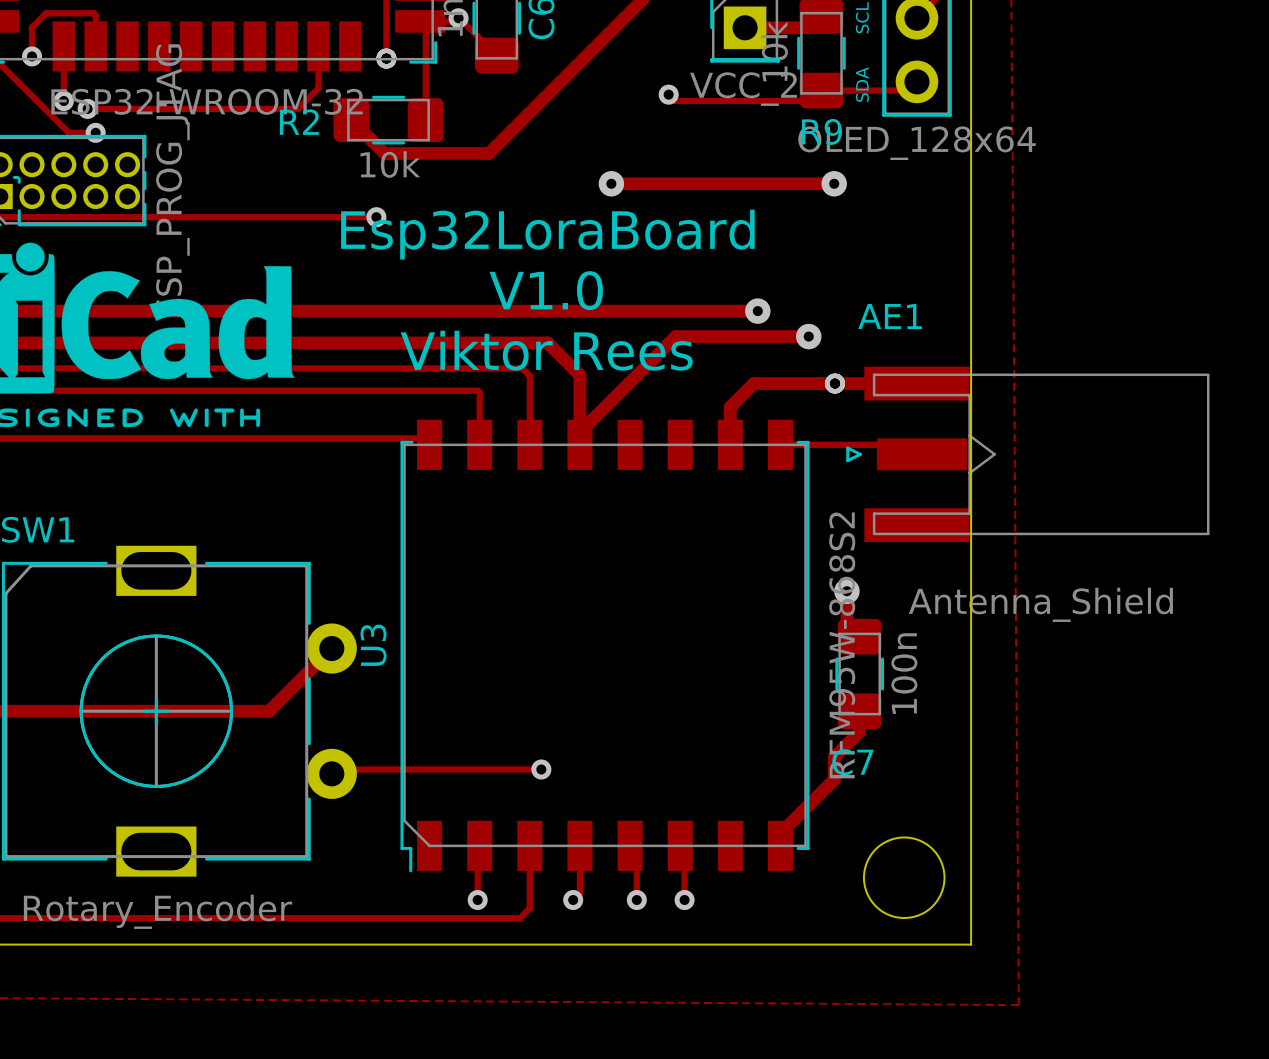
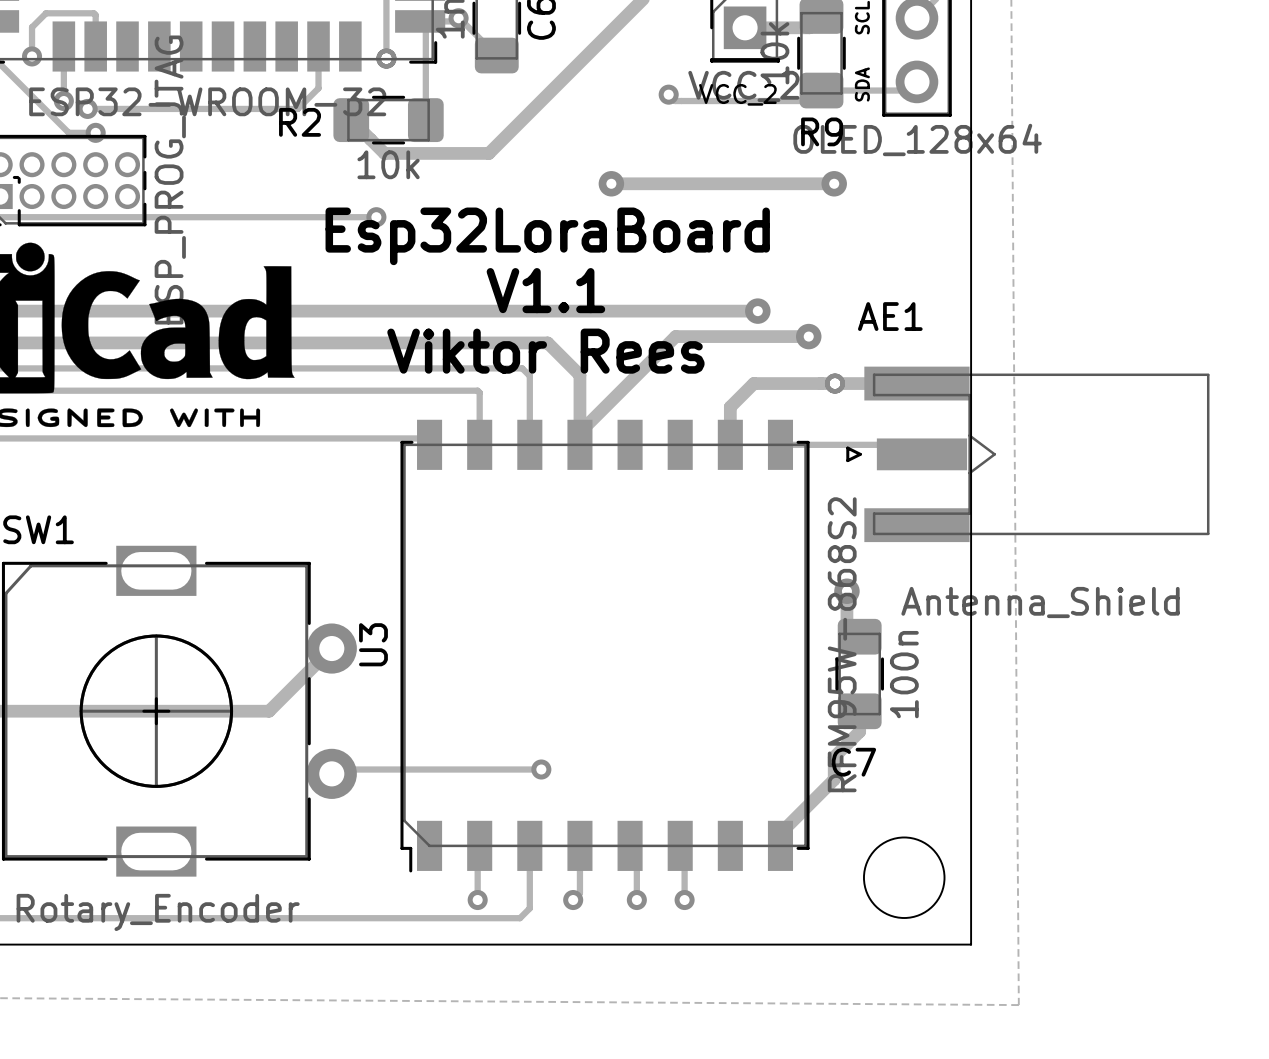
text: none -> VCC_2 (737, 94)
text: V1.0 (546, 290) -> V1.1 (545, 290)

